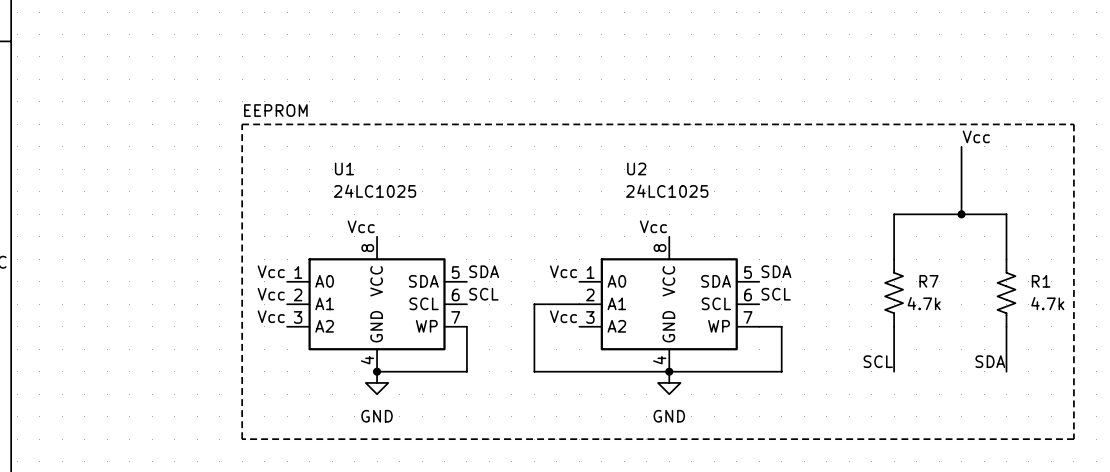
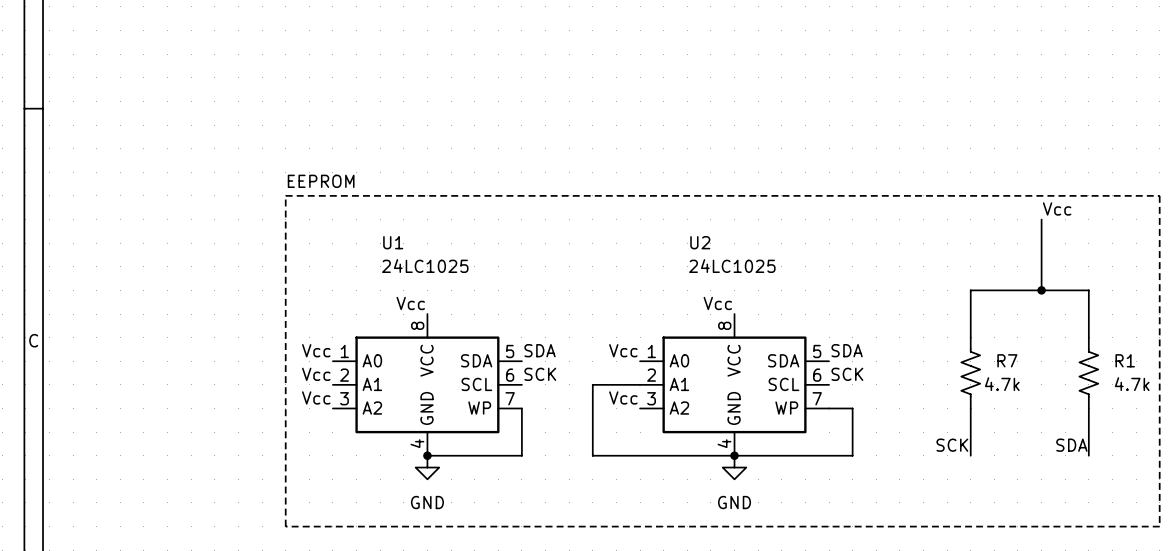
label: SCL (483, 294) -> SCK (540, 374)
label: SCL (776, 294) -> SCK (847, 374)
label: SCL (878, 361) -> SCK (952, 445)

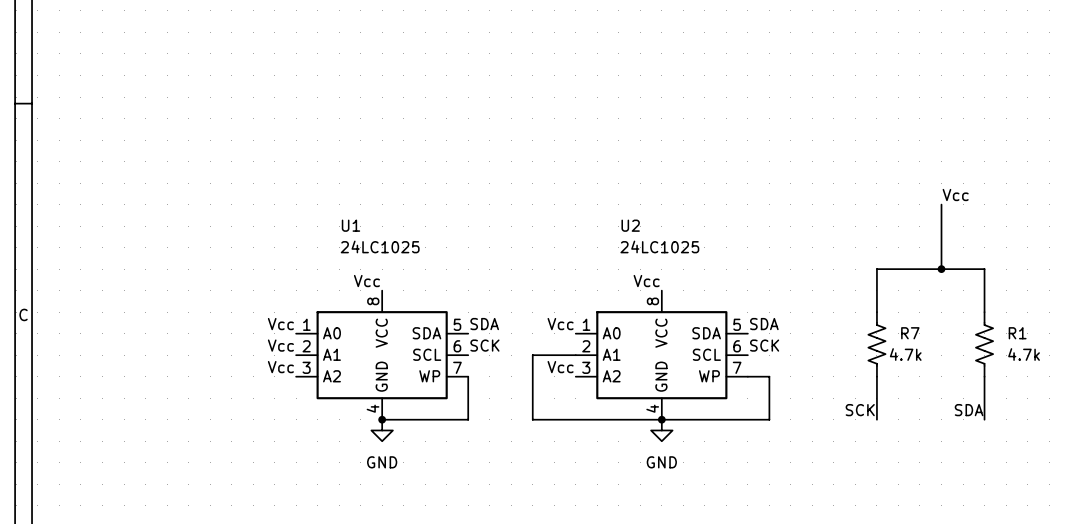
text: EEPROM (321, 181) -> none
line: (285, 195) (1159, 195) (1159, 526) (285, 526) (285, 195) -> none

